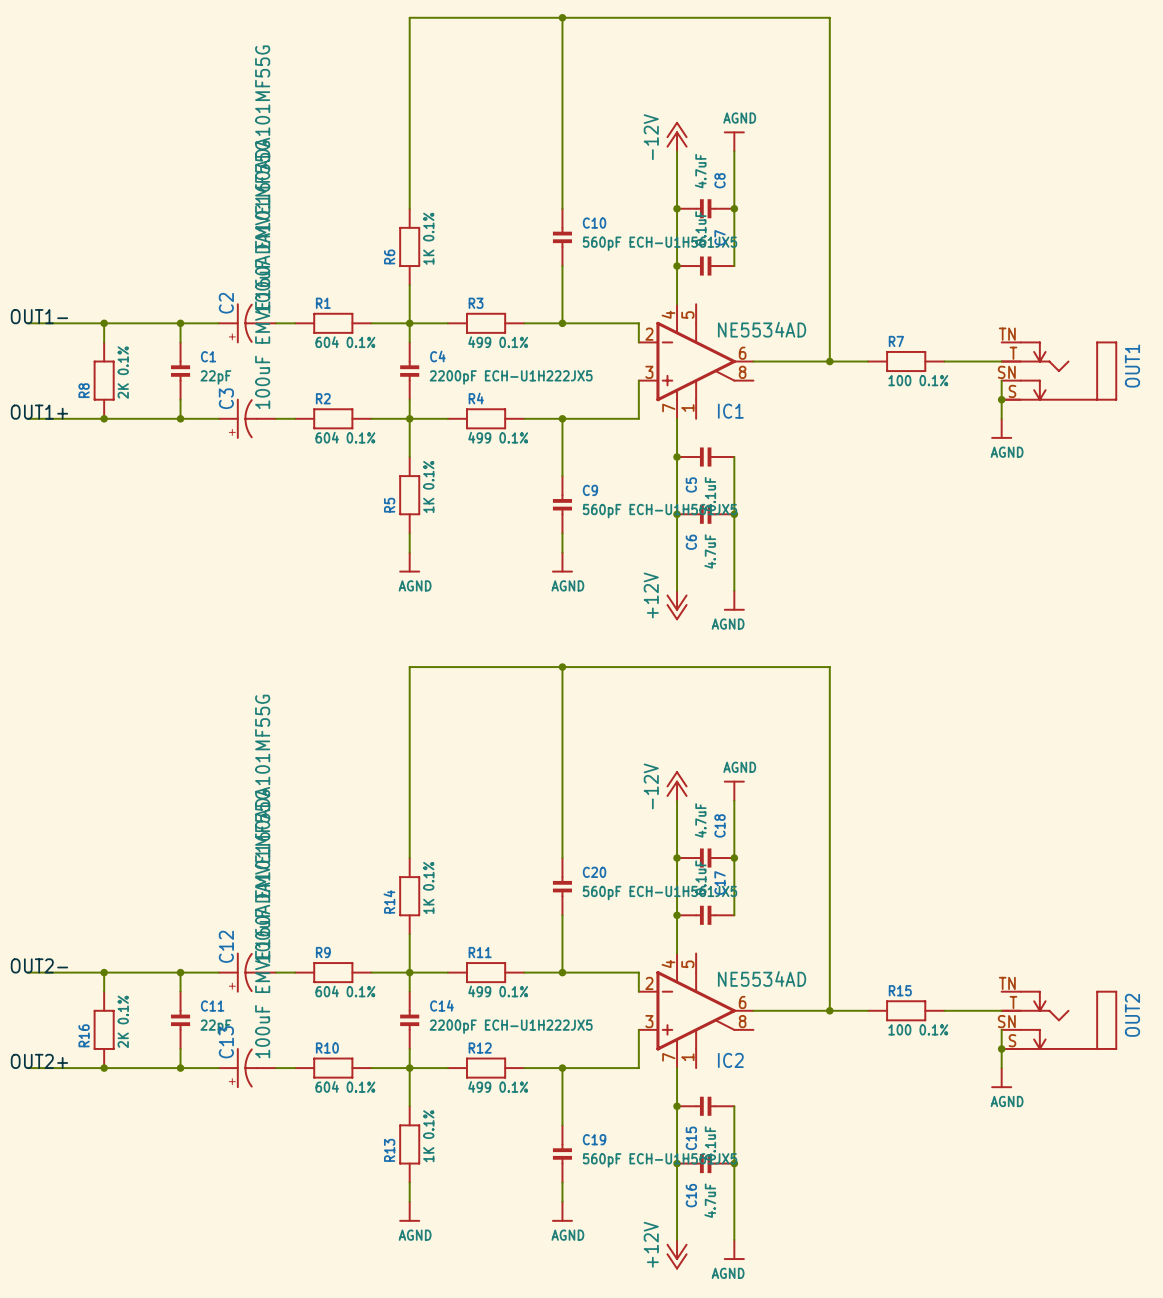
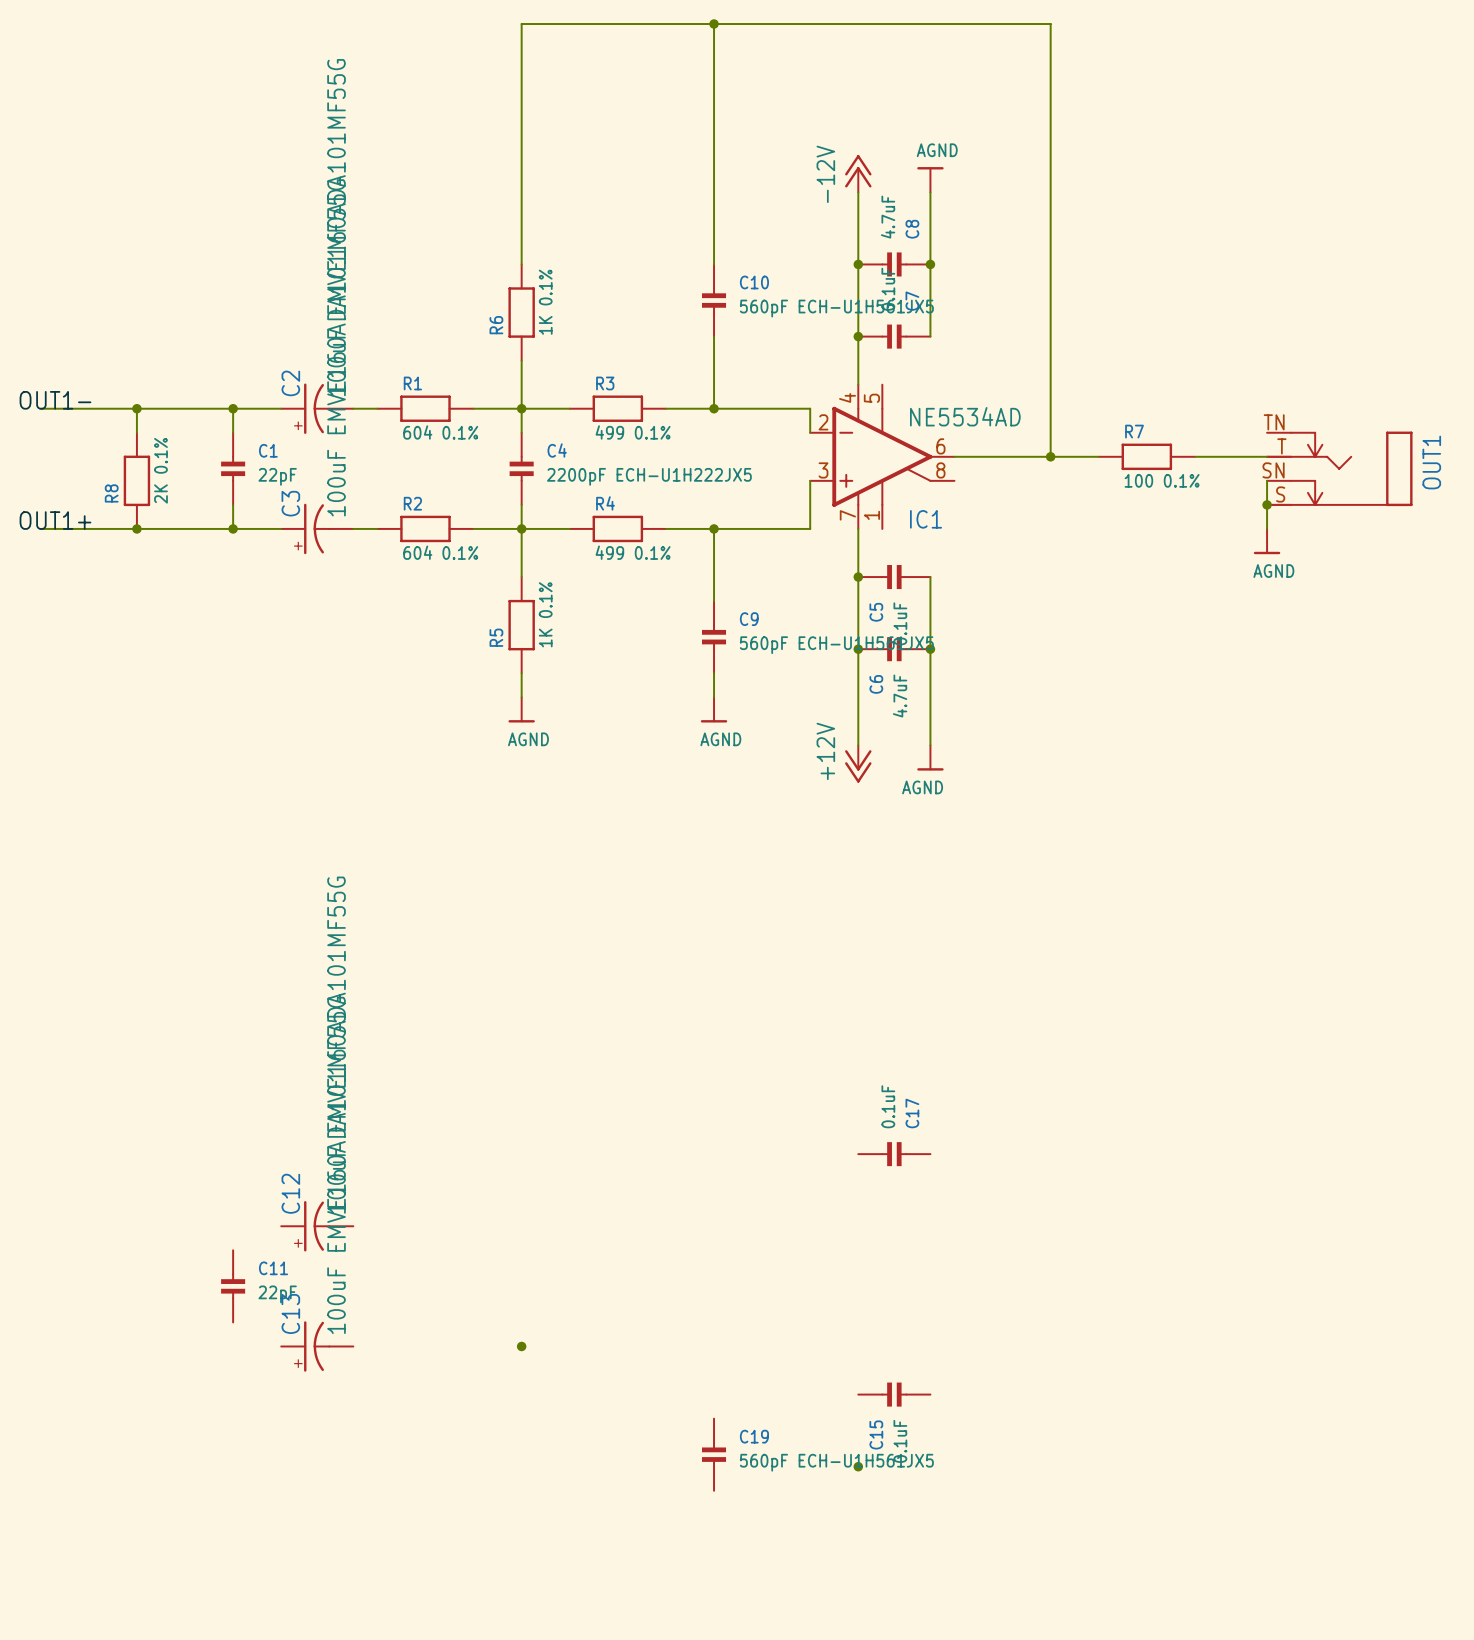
wire: (562, 667) (562, 858) -> none
junction: (562, 667) -> none
power symbol: -12V (677, 785) -> none
power symbol: AGND (734, 790) -> none
wire: (677, 800) (677, 953) -> none
wire: (734, 800) (734, 915) -> none
wire: (409, 858) (409, 667) (829, 667) (829, 1010) -> none
junction: (677, 858) -> none
C18: 4.7uF (705, 858) -> none
junction: (734, 858) -> none
C20: 560pF ECH-U1H561JX5 (562, 886) -> none
R14: 1K 0.1% (409, 896) -> none
wire: (562, 915) (562, 972) -> none
junction: (677, 915) -> none
wire: (409, 934) (409, 991) -> none
label: OUT2- (39, 965) -> none
wire: (27, 972) (218, 972) -> none
wire: (104, 972) (104, 991) -> none
junction: (104, 972) -> none
wire: (180, 972) (180, 991) -> none
junction: (180, 972) -> none
wire: (276, 972) (295, 972) -> none
R9: 604 0.1% (333, 972) -> none
wire: (371, 972) (447, 972) -> none
junction: (409, 972) -> none
R11: 499 0.1% (486, 972) -> none
wire: (524, 972) (638, 972) (638, 991) -> none
junction: (562, 972) -> none
IC2: NE5534AD (696, 1010) -> none
wire: (753, 1010) (868, 1010) -> none
junction: (829, 1010) -> none
R15: 100 0.1% (906, 1010) -> none
wire: (944, 1010) (1001, 1010) -> none
C14: 2200pF ECH-U1H222JX5 (409, 1020) -> none
OUT2: (1059, 1020) -> none
R16: 2K 0.1% (104, 1029) -> none
wire: (638, 1029) (638, 1068) (524, 1068) -> none
wire: (1001, 1029) (1001, 1068) -> none
wire: (180, 1048) (180, 1068) -> none
wire: (409, 1048) (409, 1106) -> none
junction: (1001, 1048) -> none
label: OUT2+ (39, 1061) -> none
wire: (27, 1068) (218, 1068) -> none
junction: (104, 1068) -> none
junction: (180, 1068) -> none
wire: (276, 1068) (295, 1068) -> none
R10: 604 0.1% (333, 1068) -> none
wire: (371, 1068) (447, 1068) -> none
R12: 499 0.1% (486, 1068) -> none
wire: (562, 1068) (562, 1125) -> none
junction: (562, 1068) -> none
wire: (677, 1068) (677, 1239) -> none
power symbol: AGND (1001, 1078) -> none
junction: (677, 1106) -> none
wire: (734, 1106) (734, 1239) -> none
R13: 1K 0.1% (409, 1144) -> none
C16: 4.7uF (705, 1163) -> none
junction: (734, 1163) -> none
wire: (409, 1182) (409, 1201) -> none
wire: (562, 1182) (562, 1201) -> none
power symbol: AGND (409, 1211) -> none
power symbol: AGND (562, 1211) -> none
power symbol: AGND (734, 1249) -> none
power symbol: +12V (677, 1254) -> none

